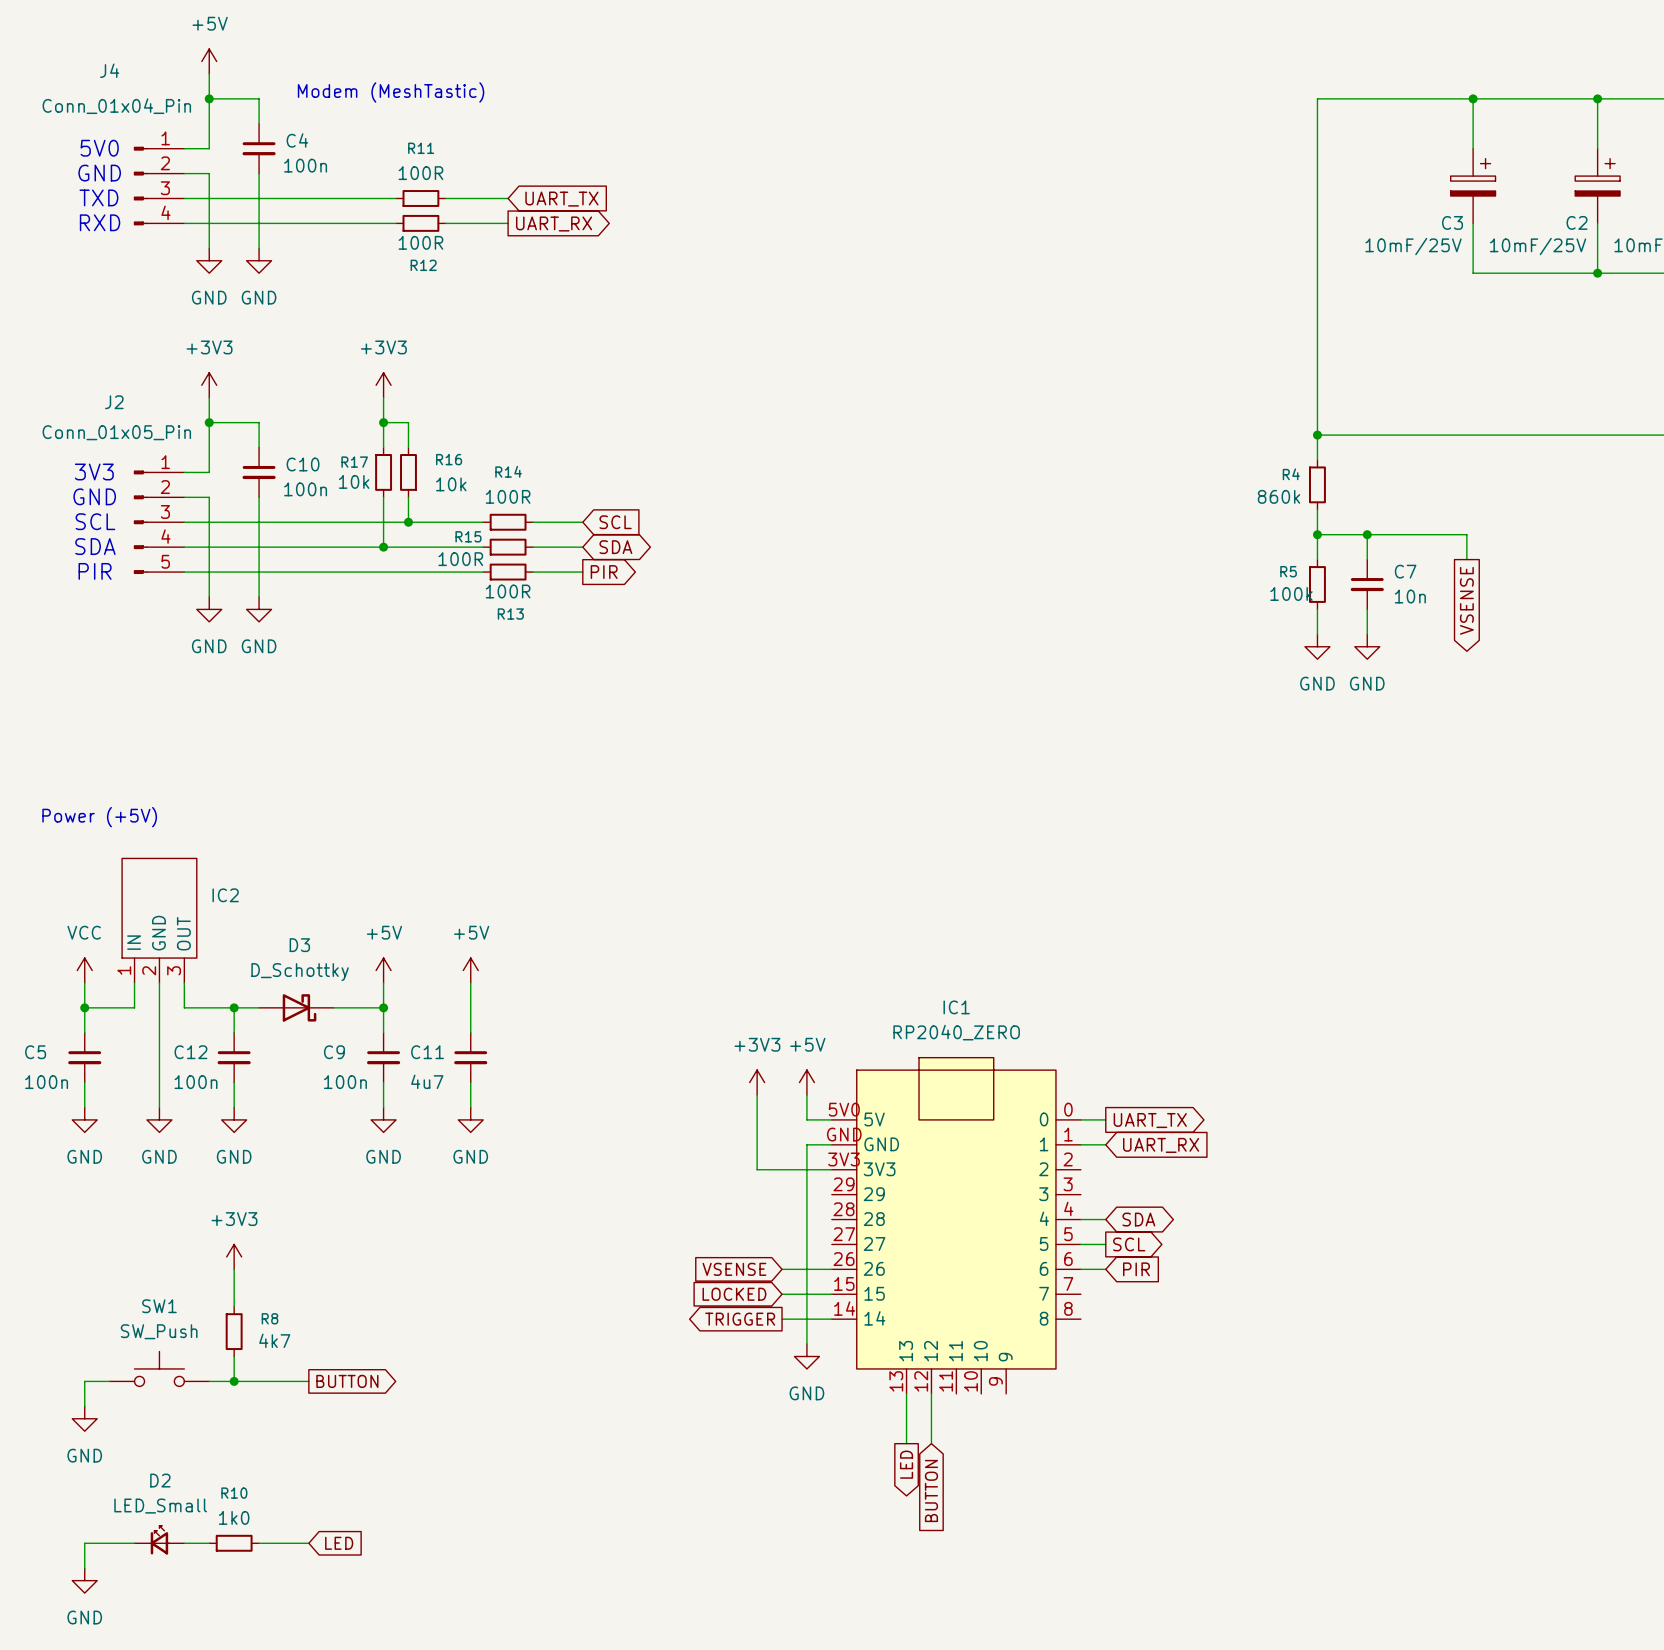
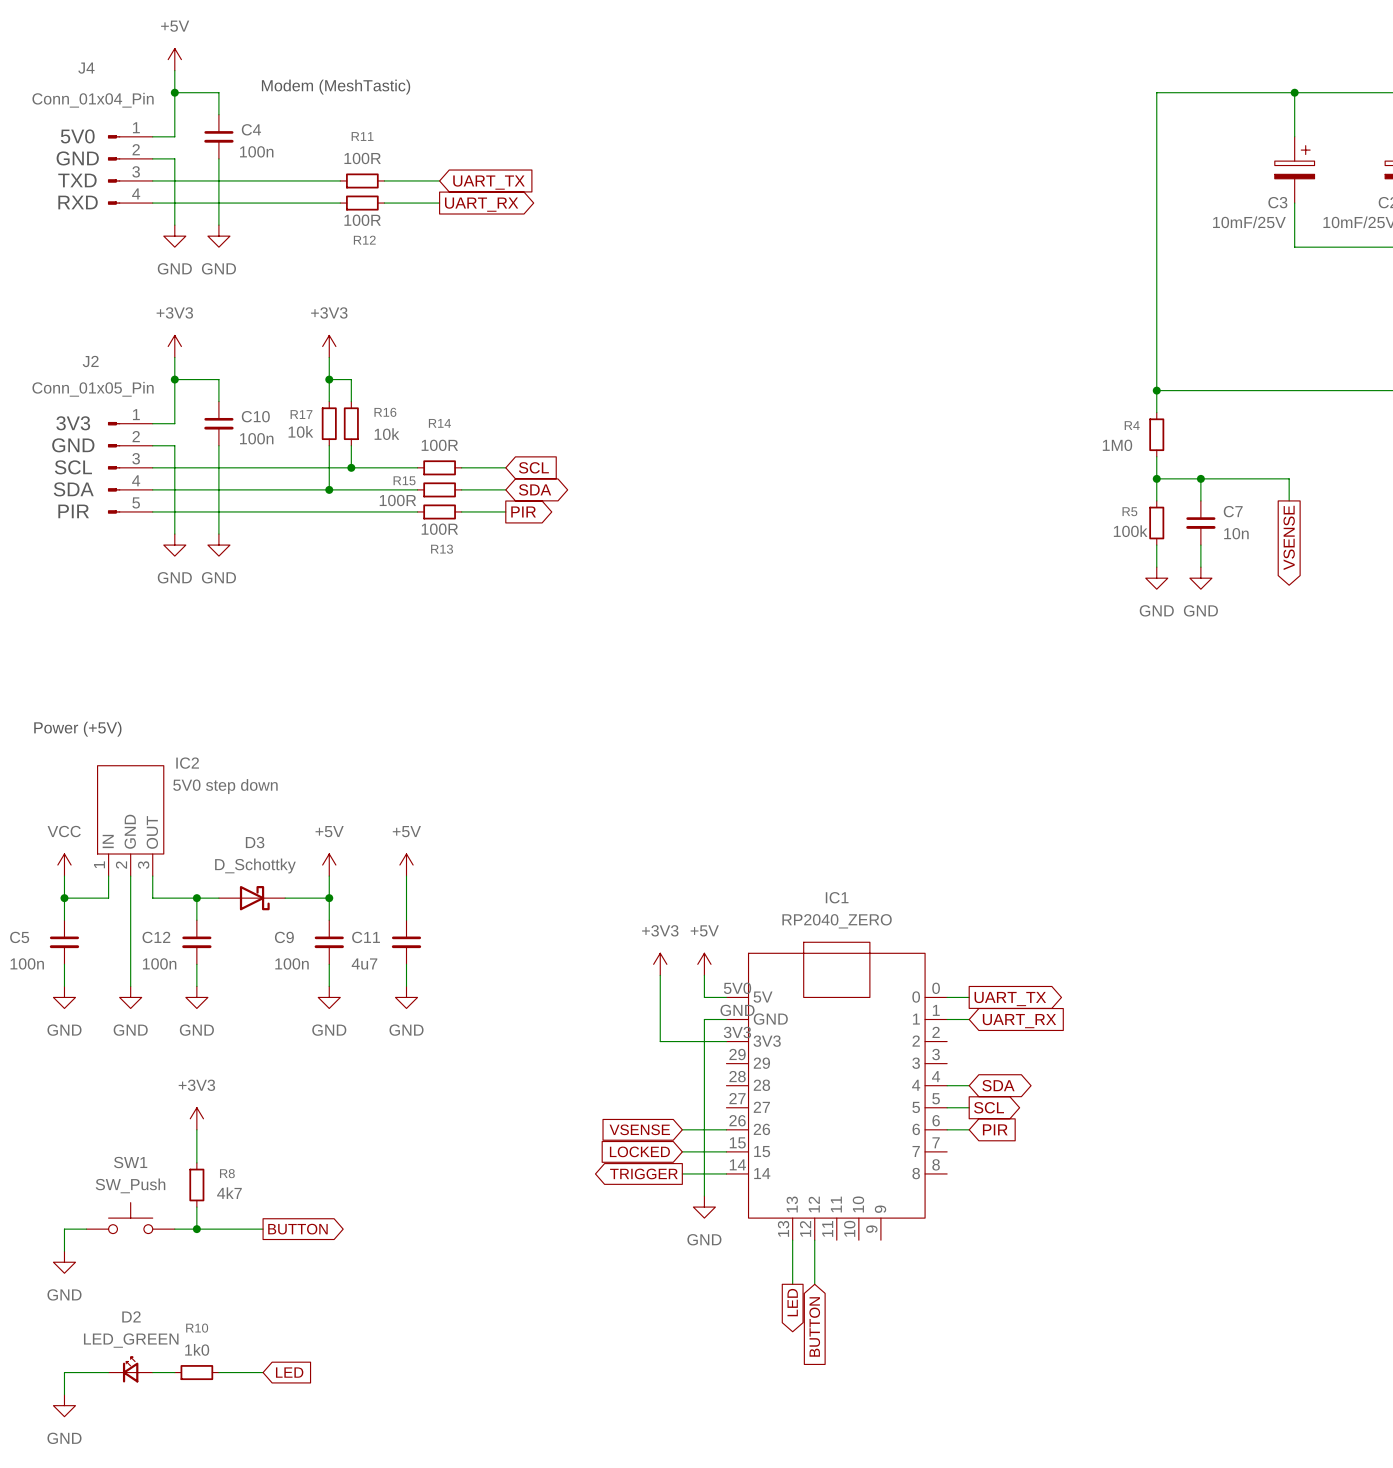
R4 value: 860k (1279, 496) -> 1M0 (1117, 445)
IC2 value: none -> 5V0 step down (225, 786)
IC2 name position: IC2 (225, 895) -> IC2 (187, 763)
D2 value: LED_Small (160, 1506) -> LED_GREEN (131, 1340)

